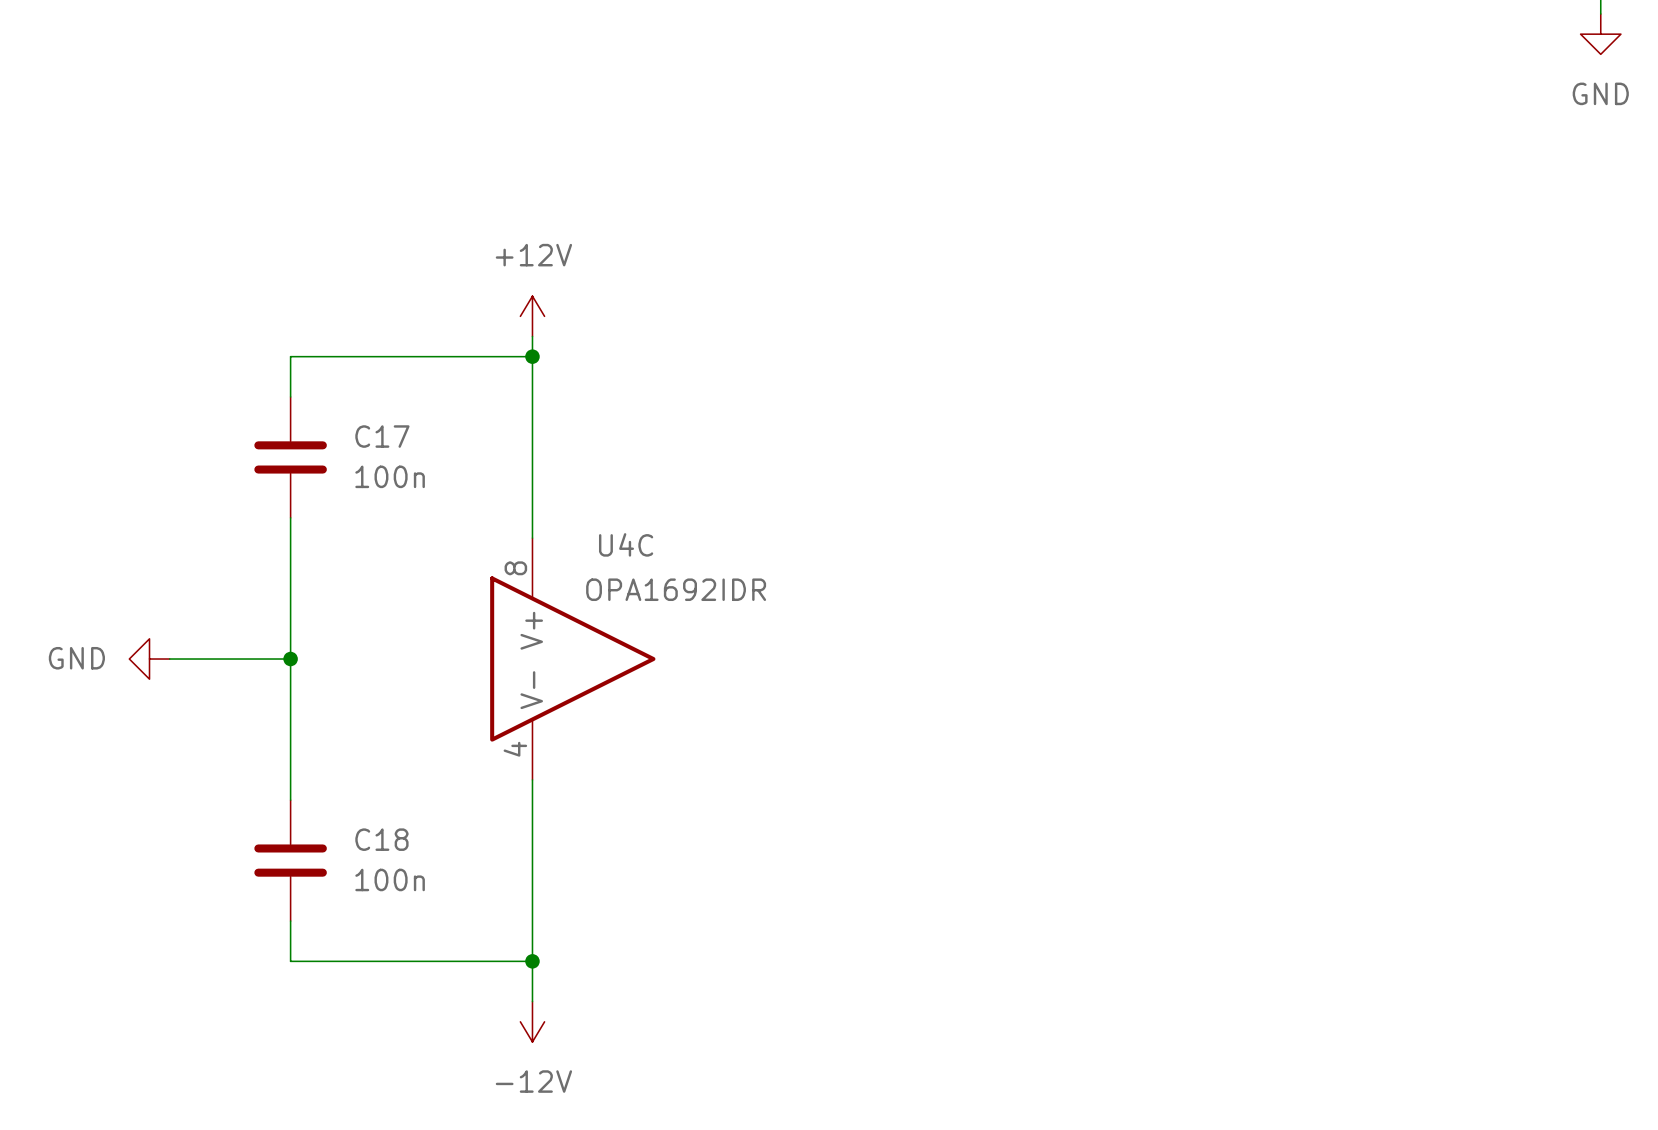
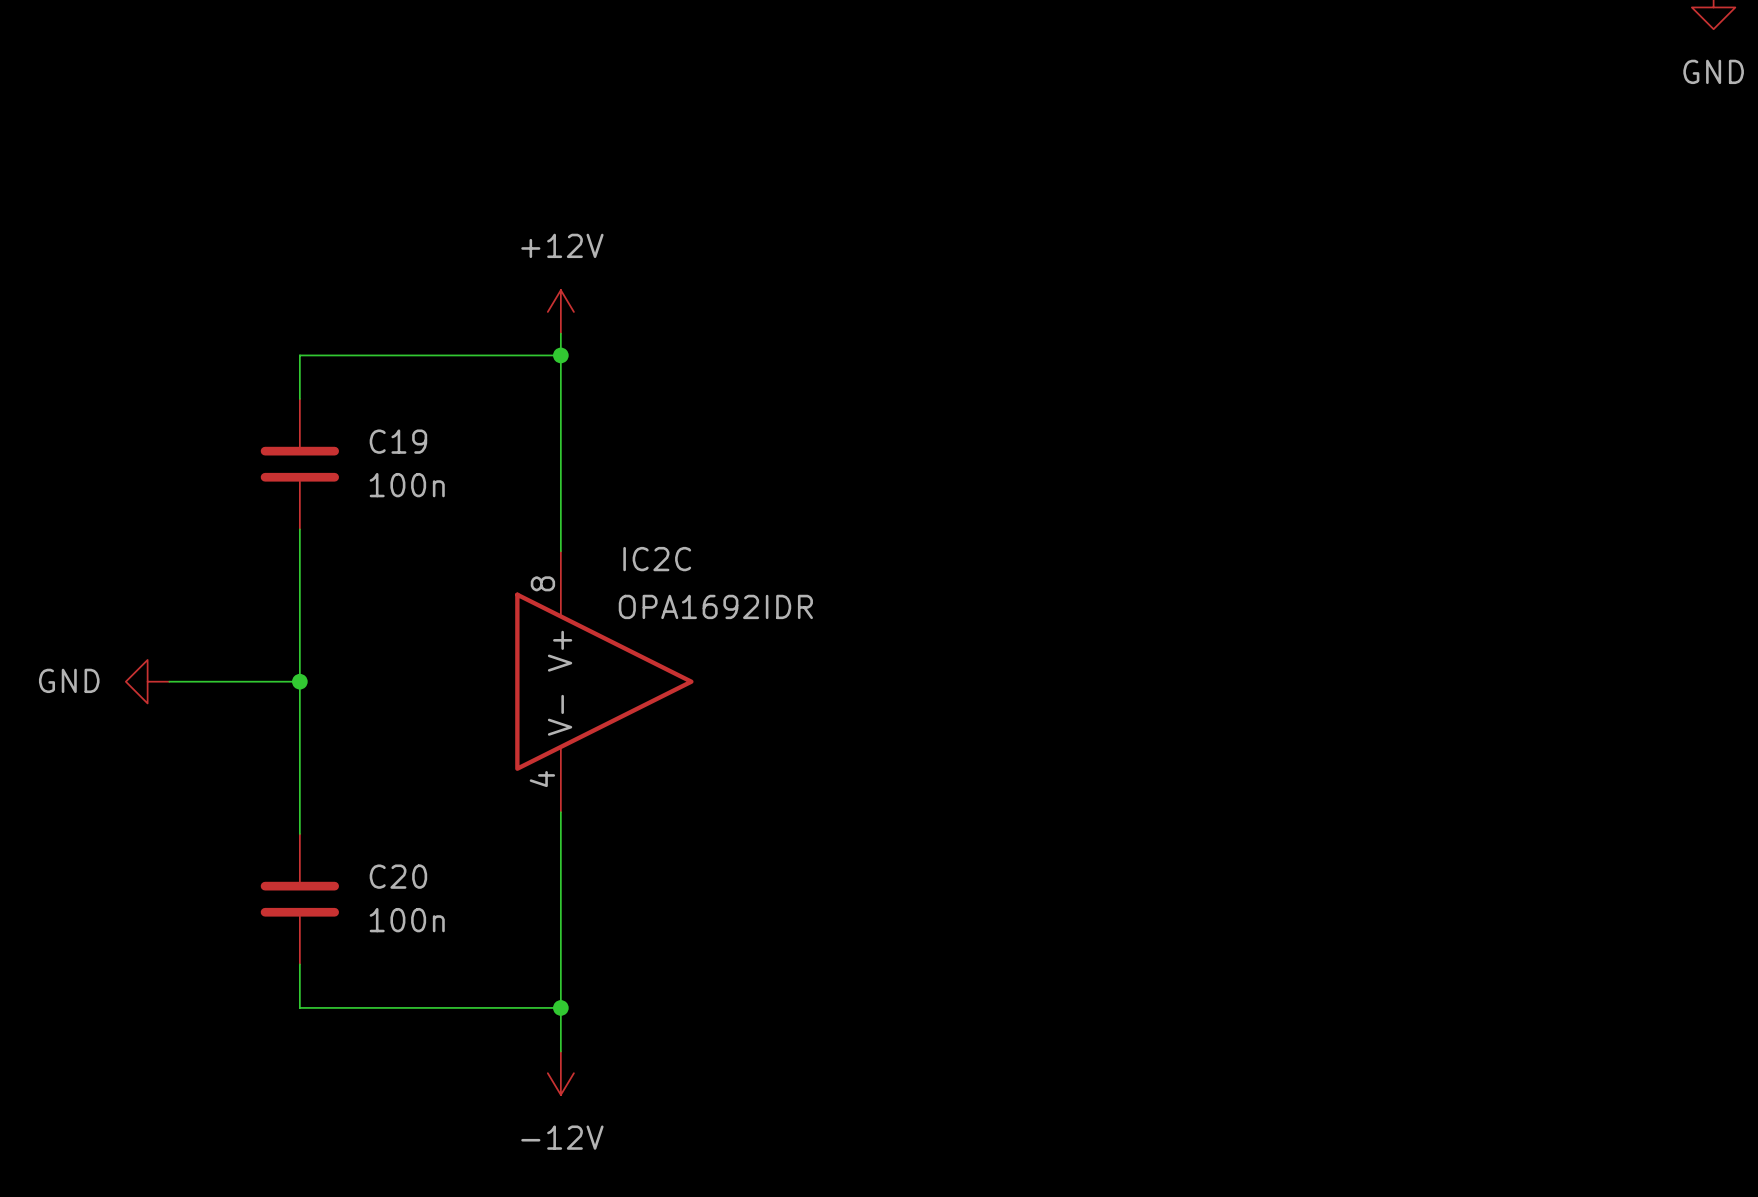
C17 name: C17 (382, 436) -> C19 (398, 441)
U4C name: U4C (626, 544) -> IC2C (657, 559)
C18 name: C18 (381, 839) -> C20 (398, 876)

